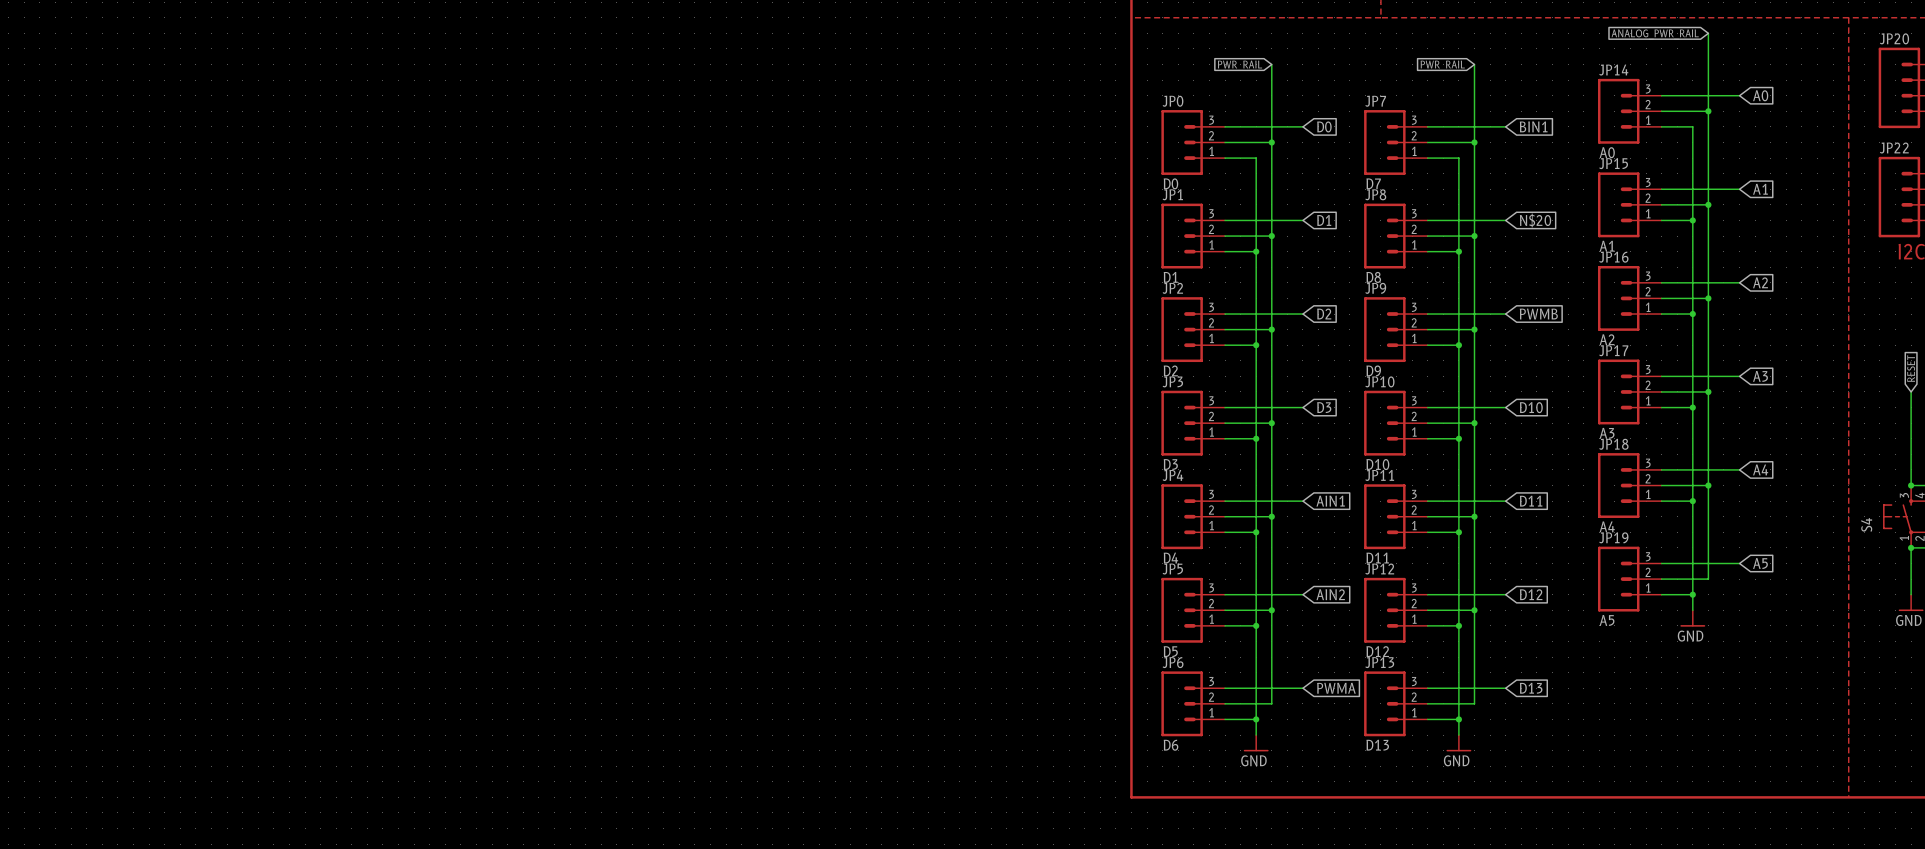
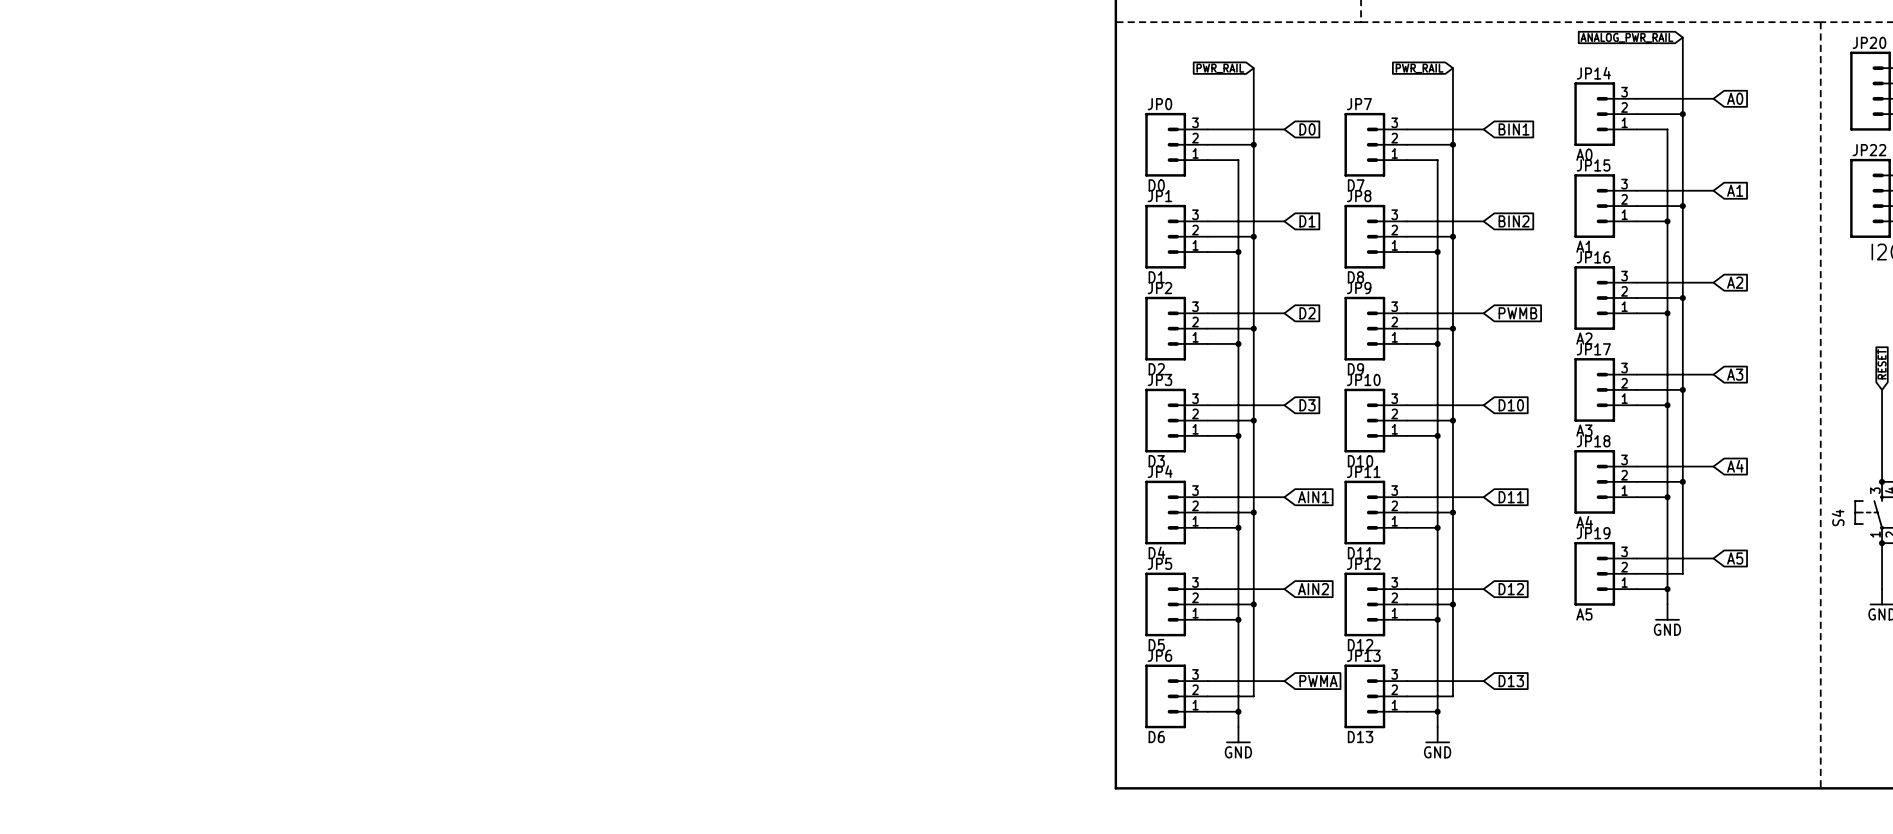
global label: N$20 (1535, 220) -> BIN2 (1514, 221)

